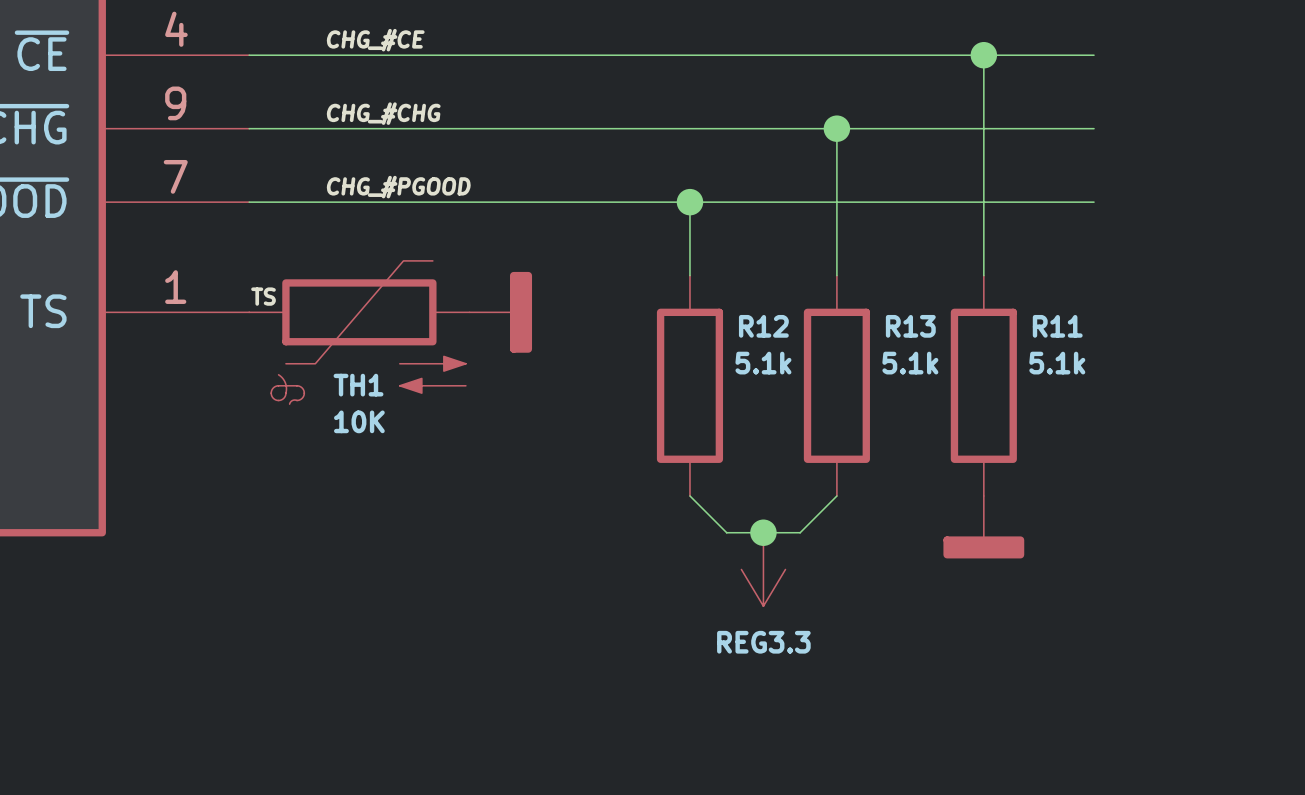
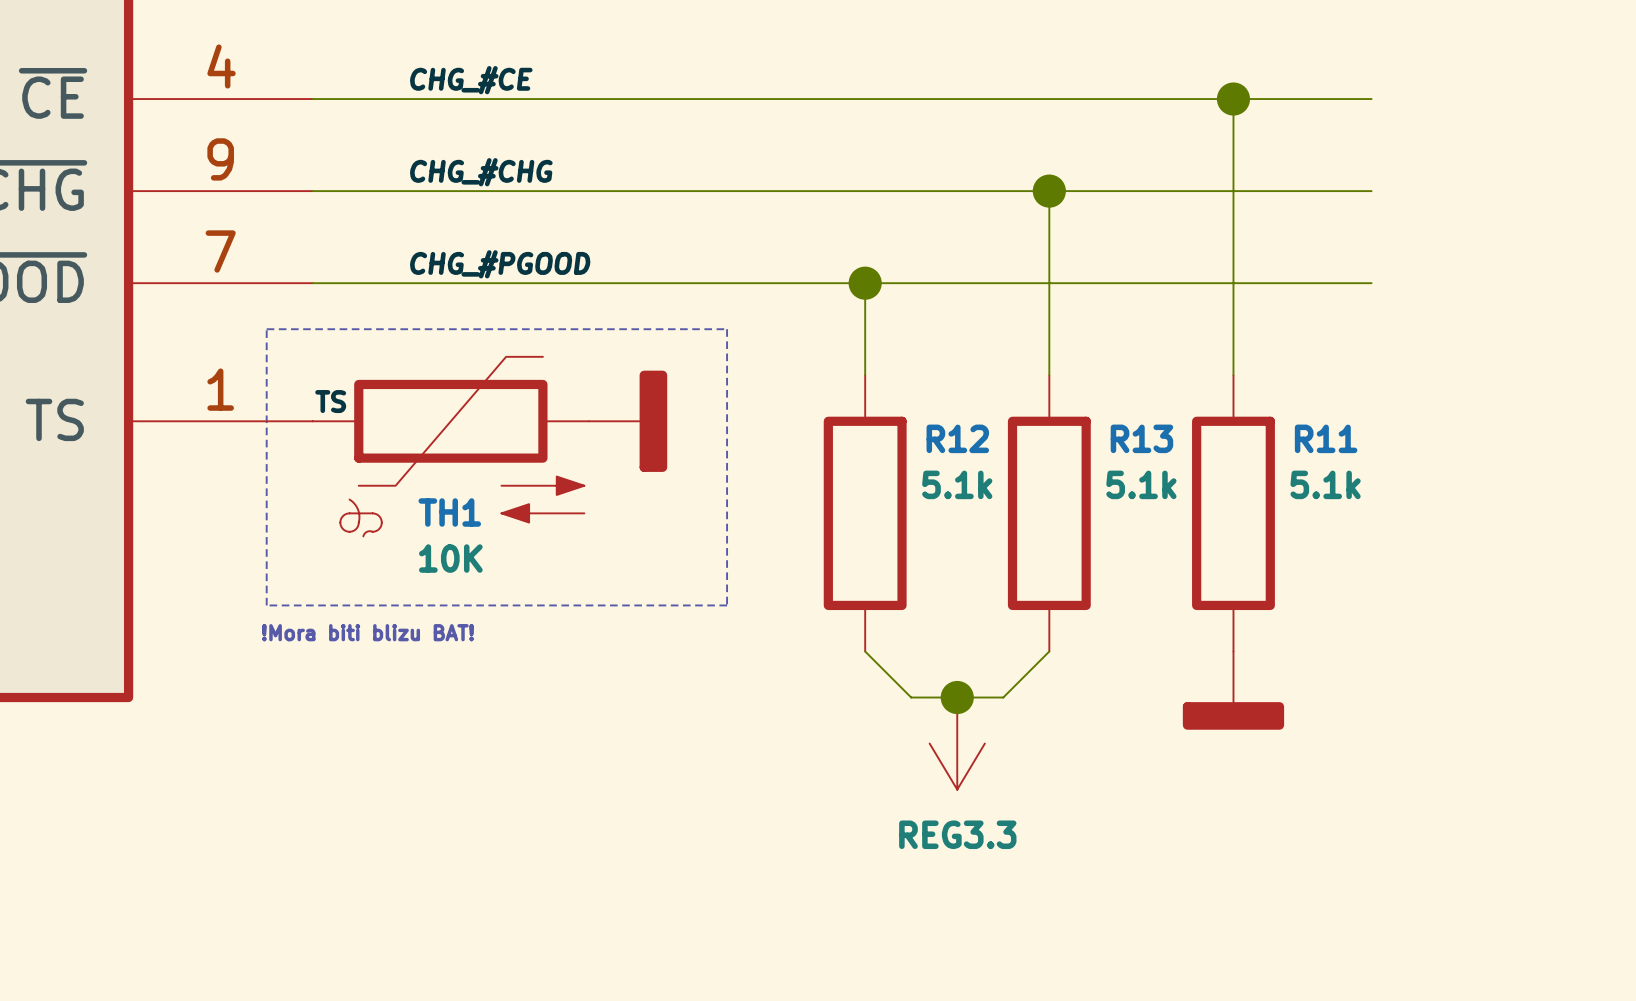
line: none -> (266, 329) (727, 329) (727, 605) (266, 605) (266, 329)
text: none -> !Mora biti blizu BAT! (367, 632)

